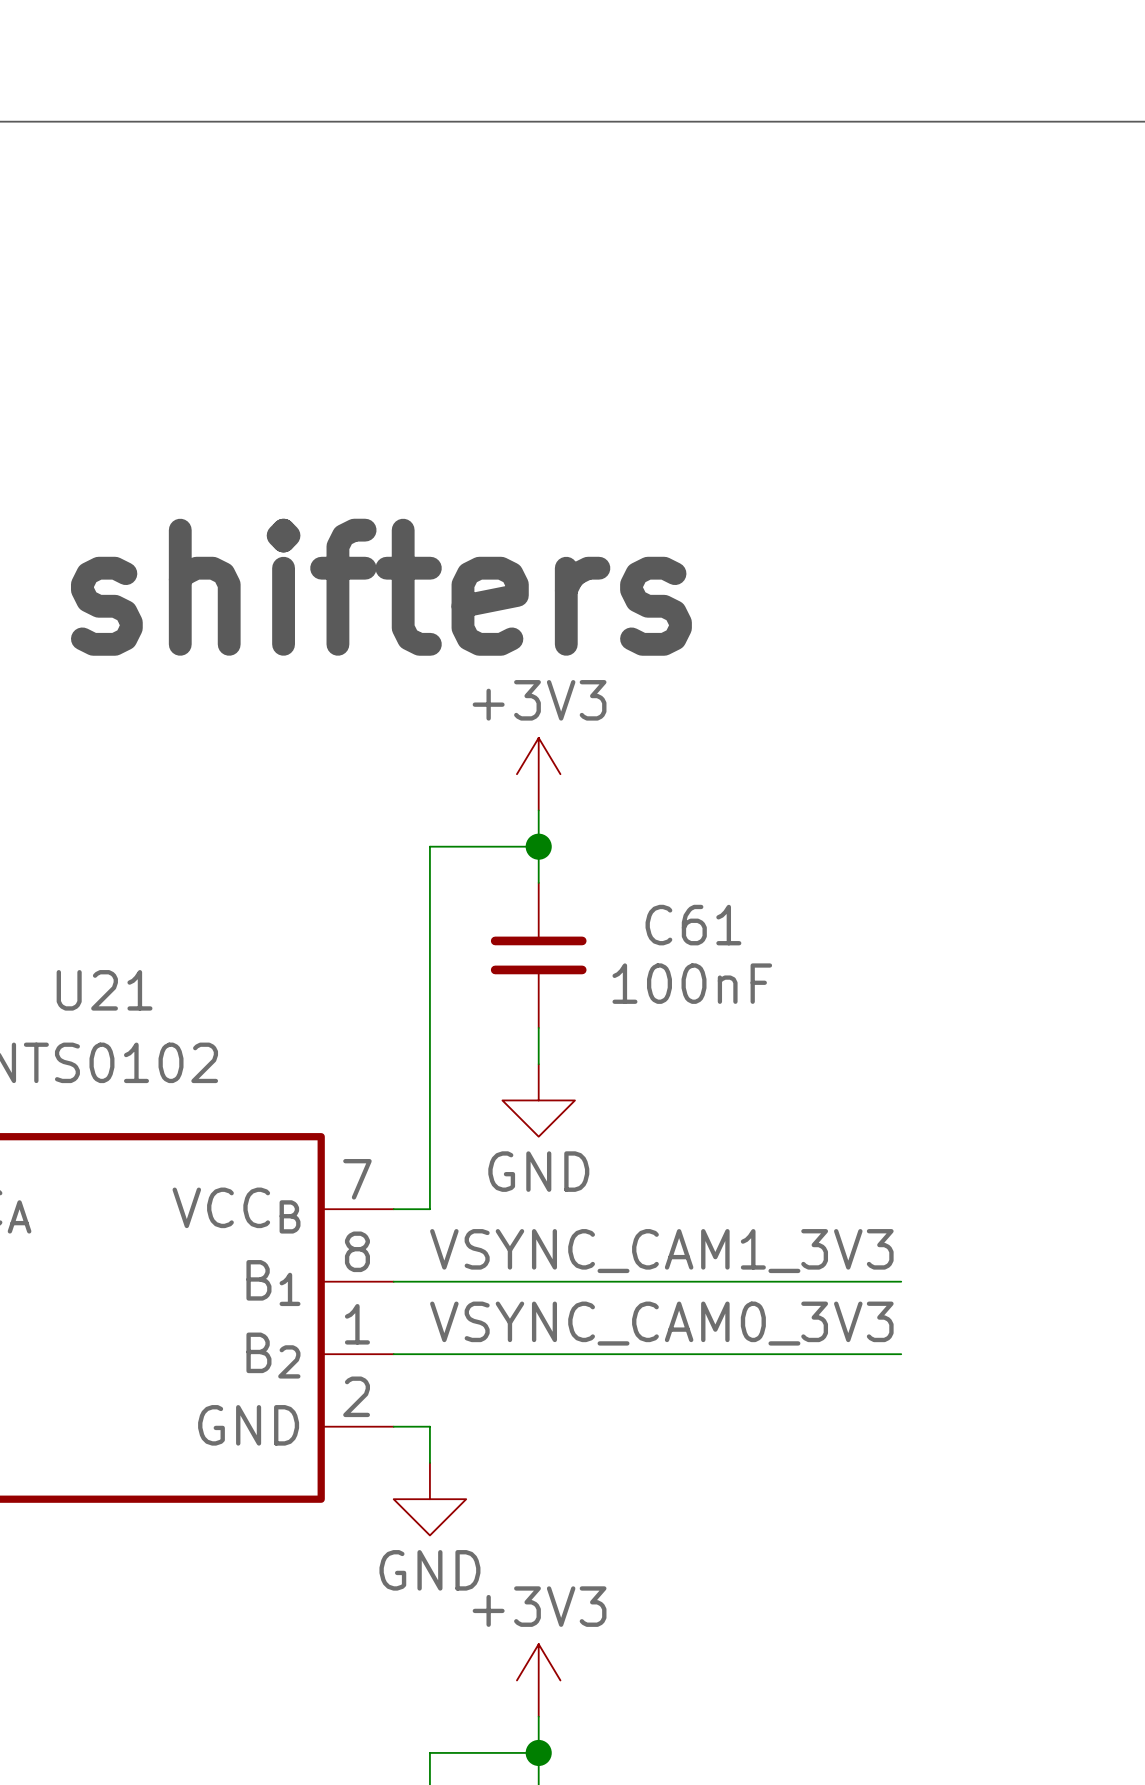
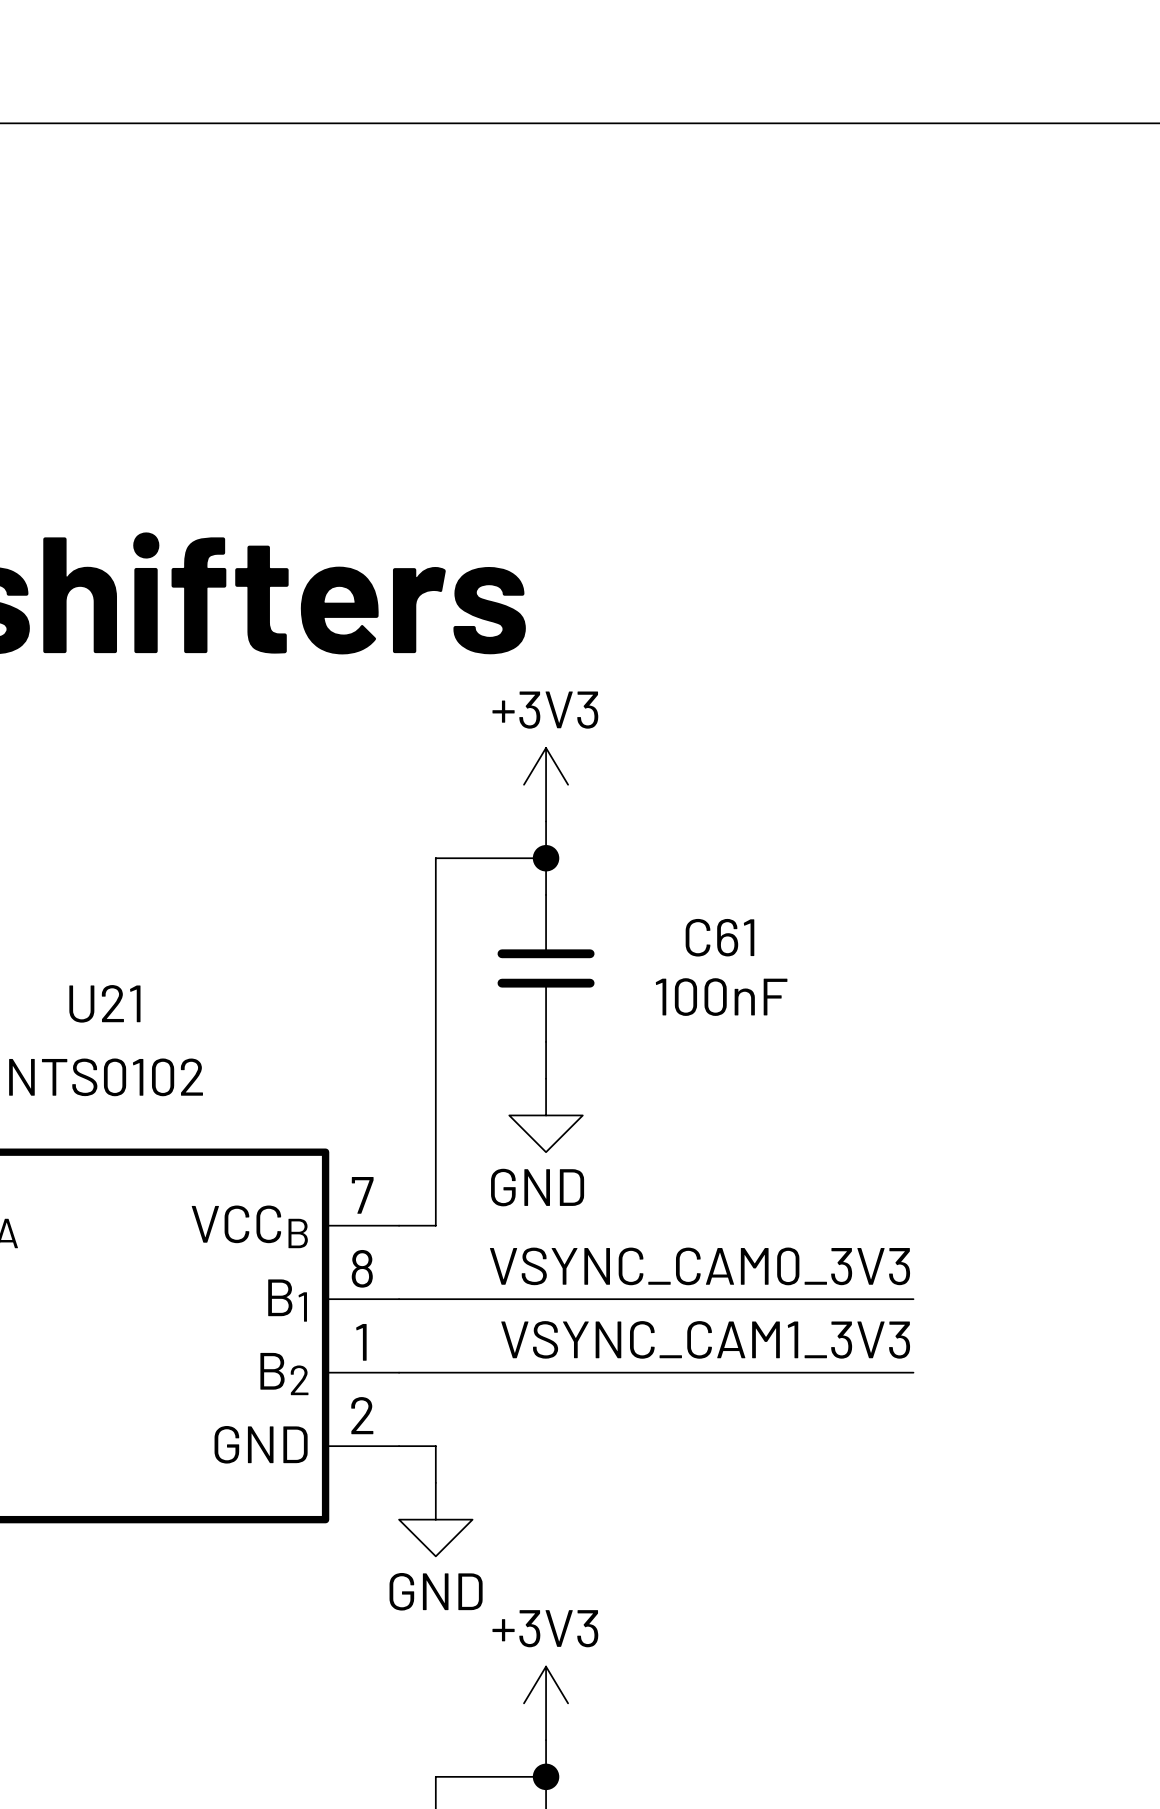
label: VSYNC_CAM1_3V3 (661, 1251) -> VSYNC_CAM0_3V3 (700, 1266)
label: VSYNC_CAM0_3V3 (661, 1323) -> VSYNC_CAM1_3V3 (705, 1339)

